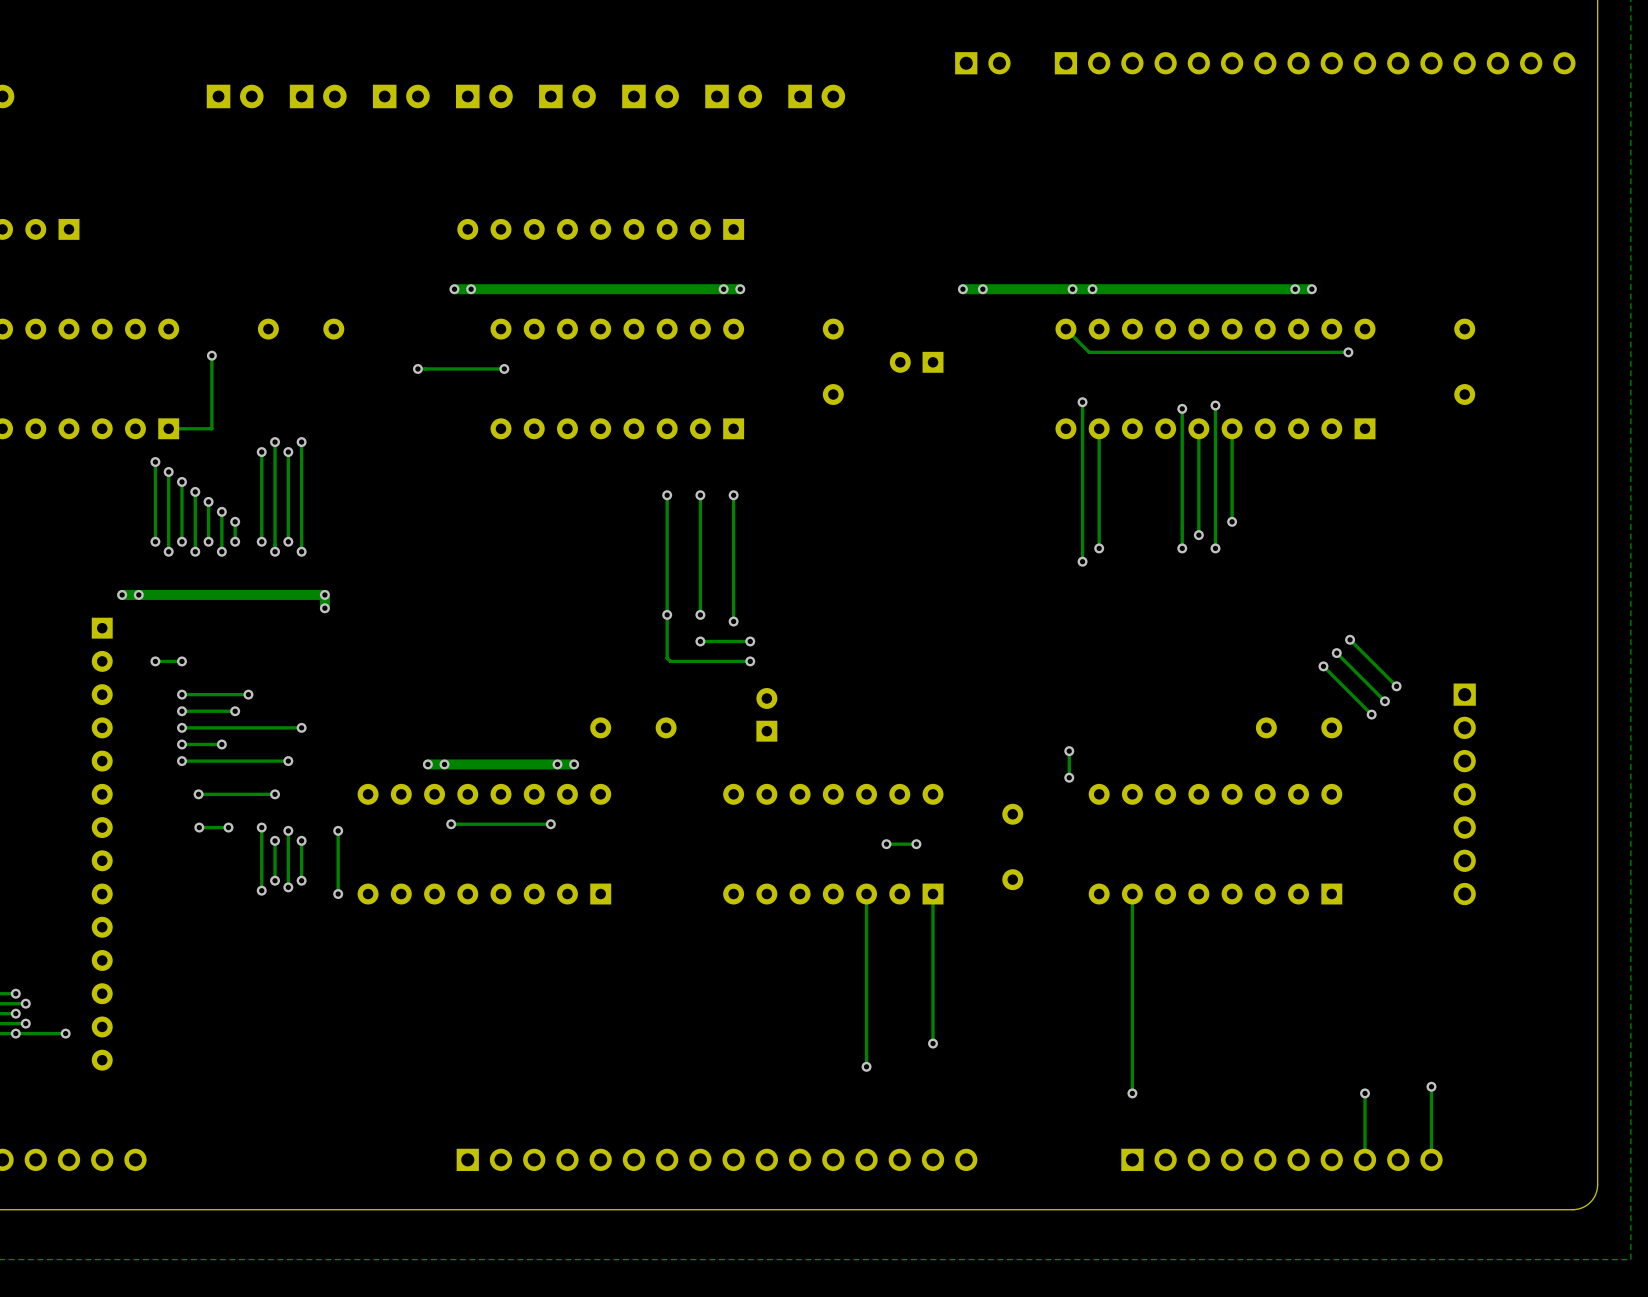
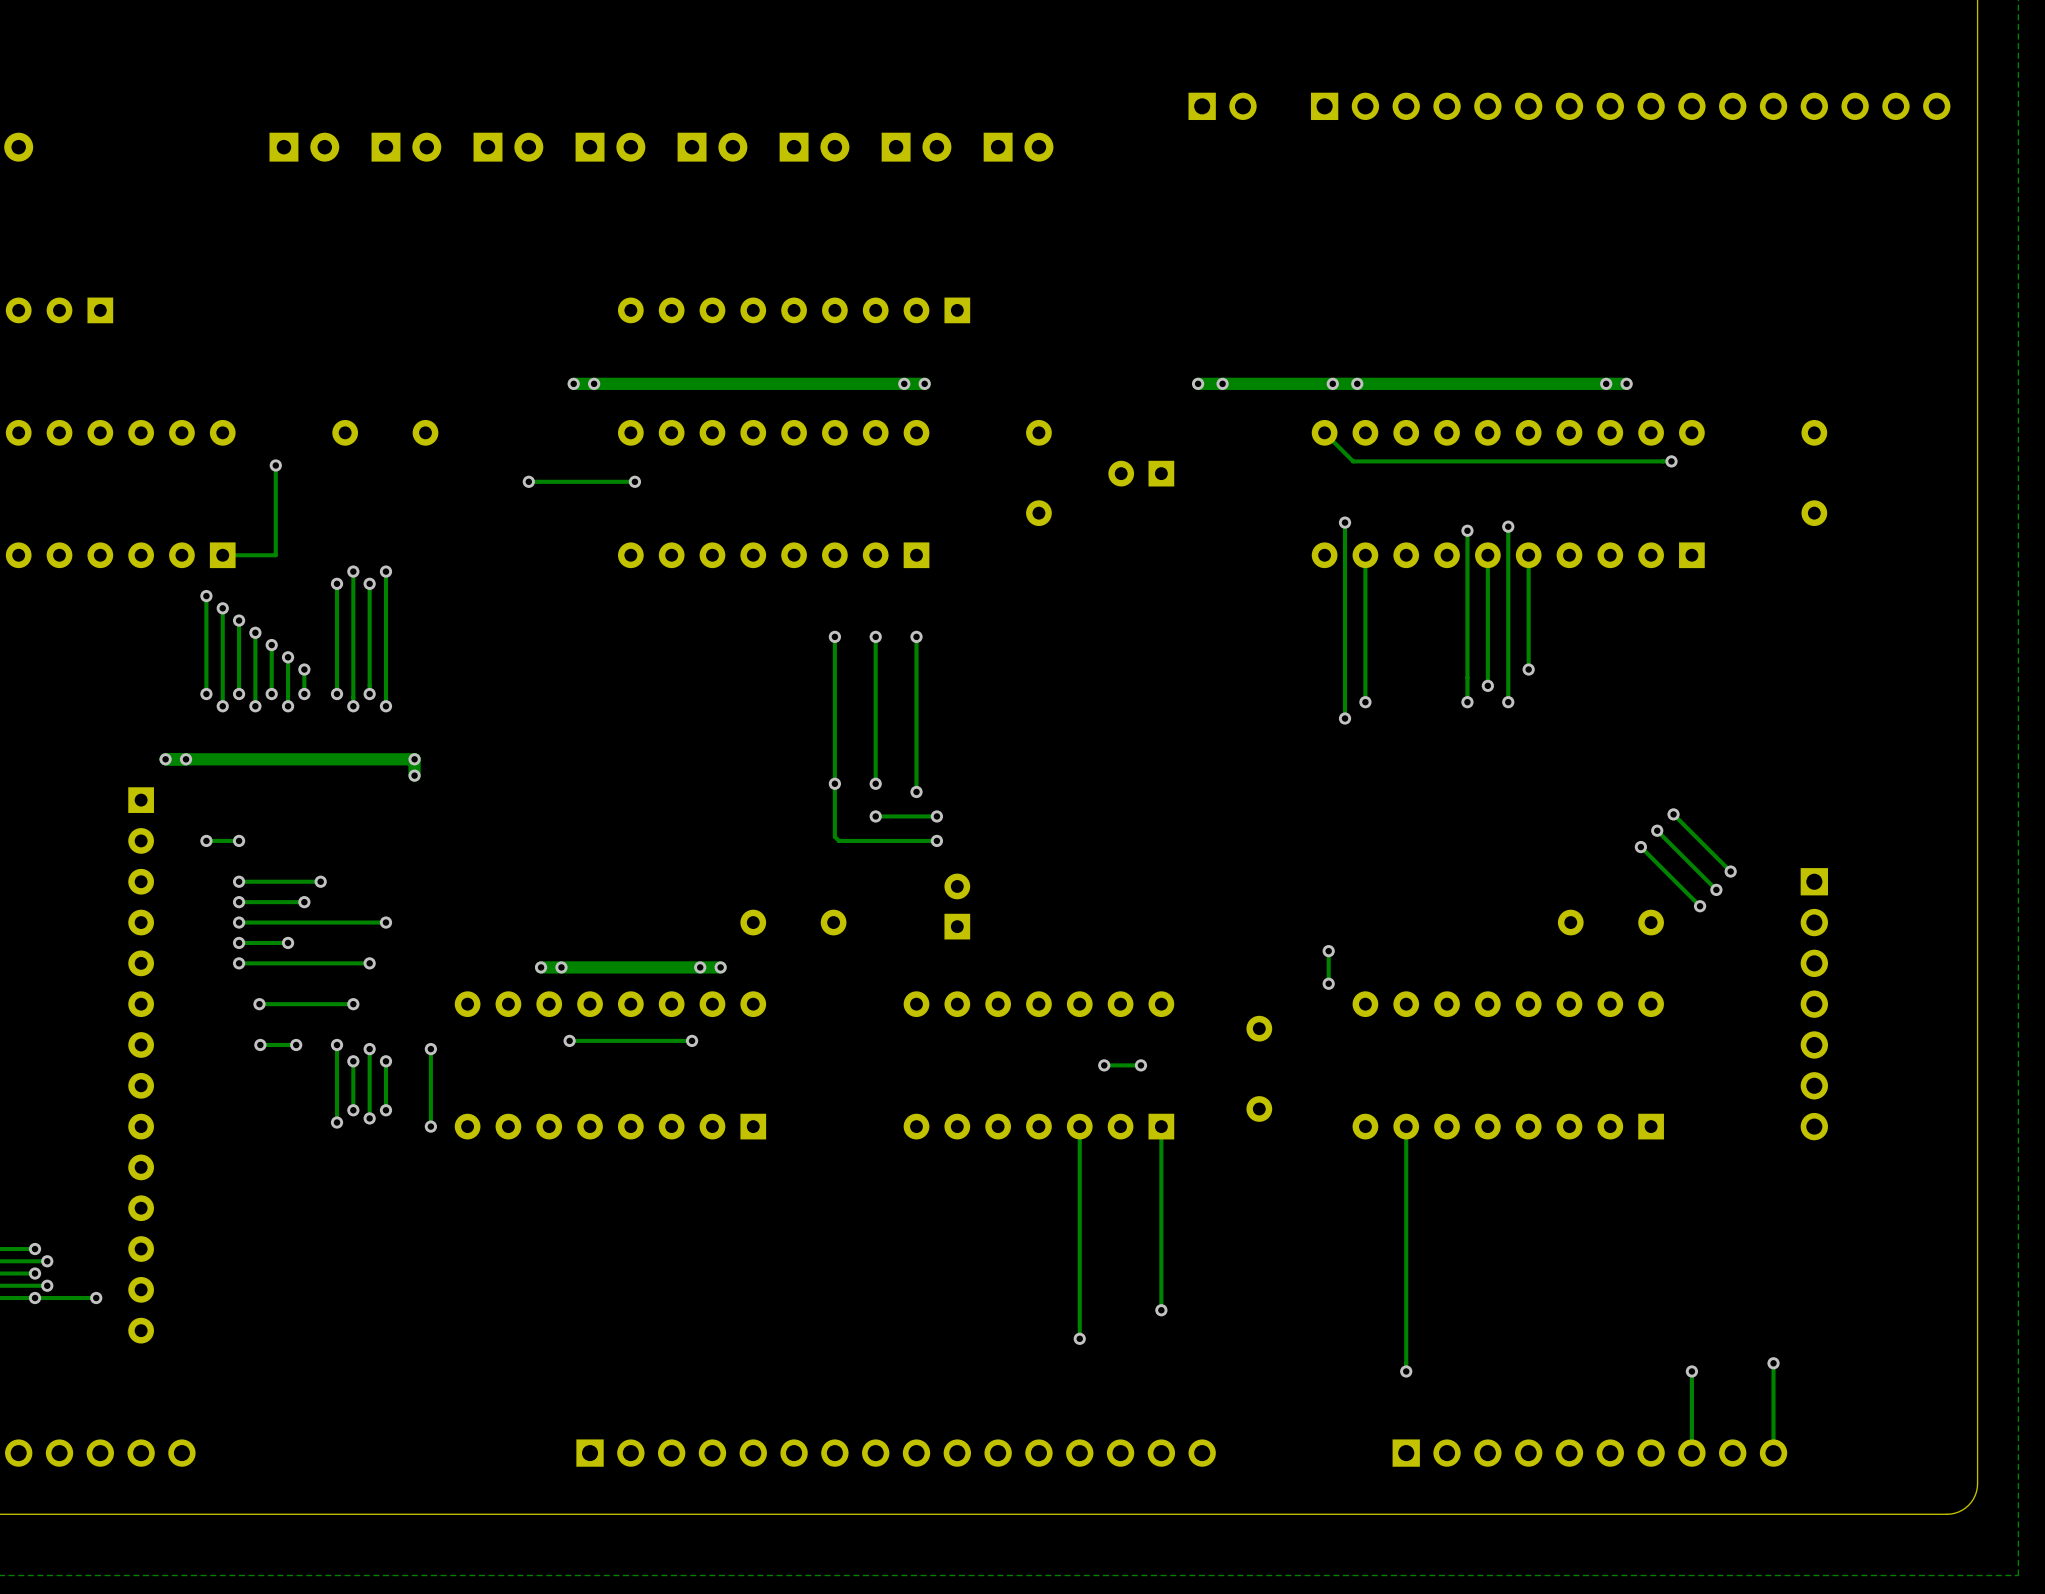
part position: (600, 229) -> (794, 310)

